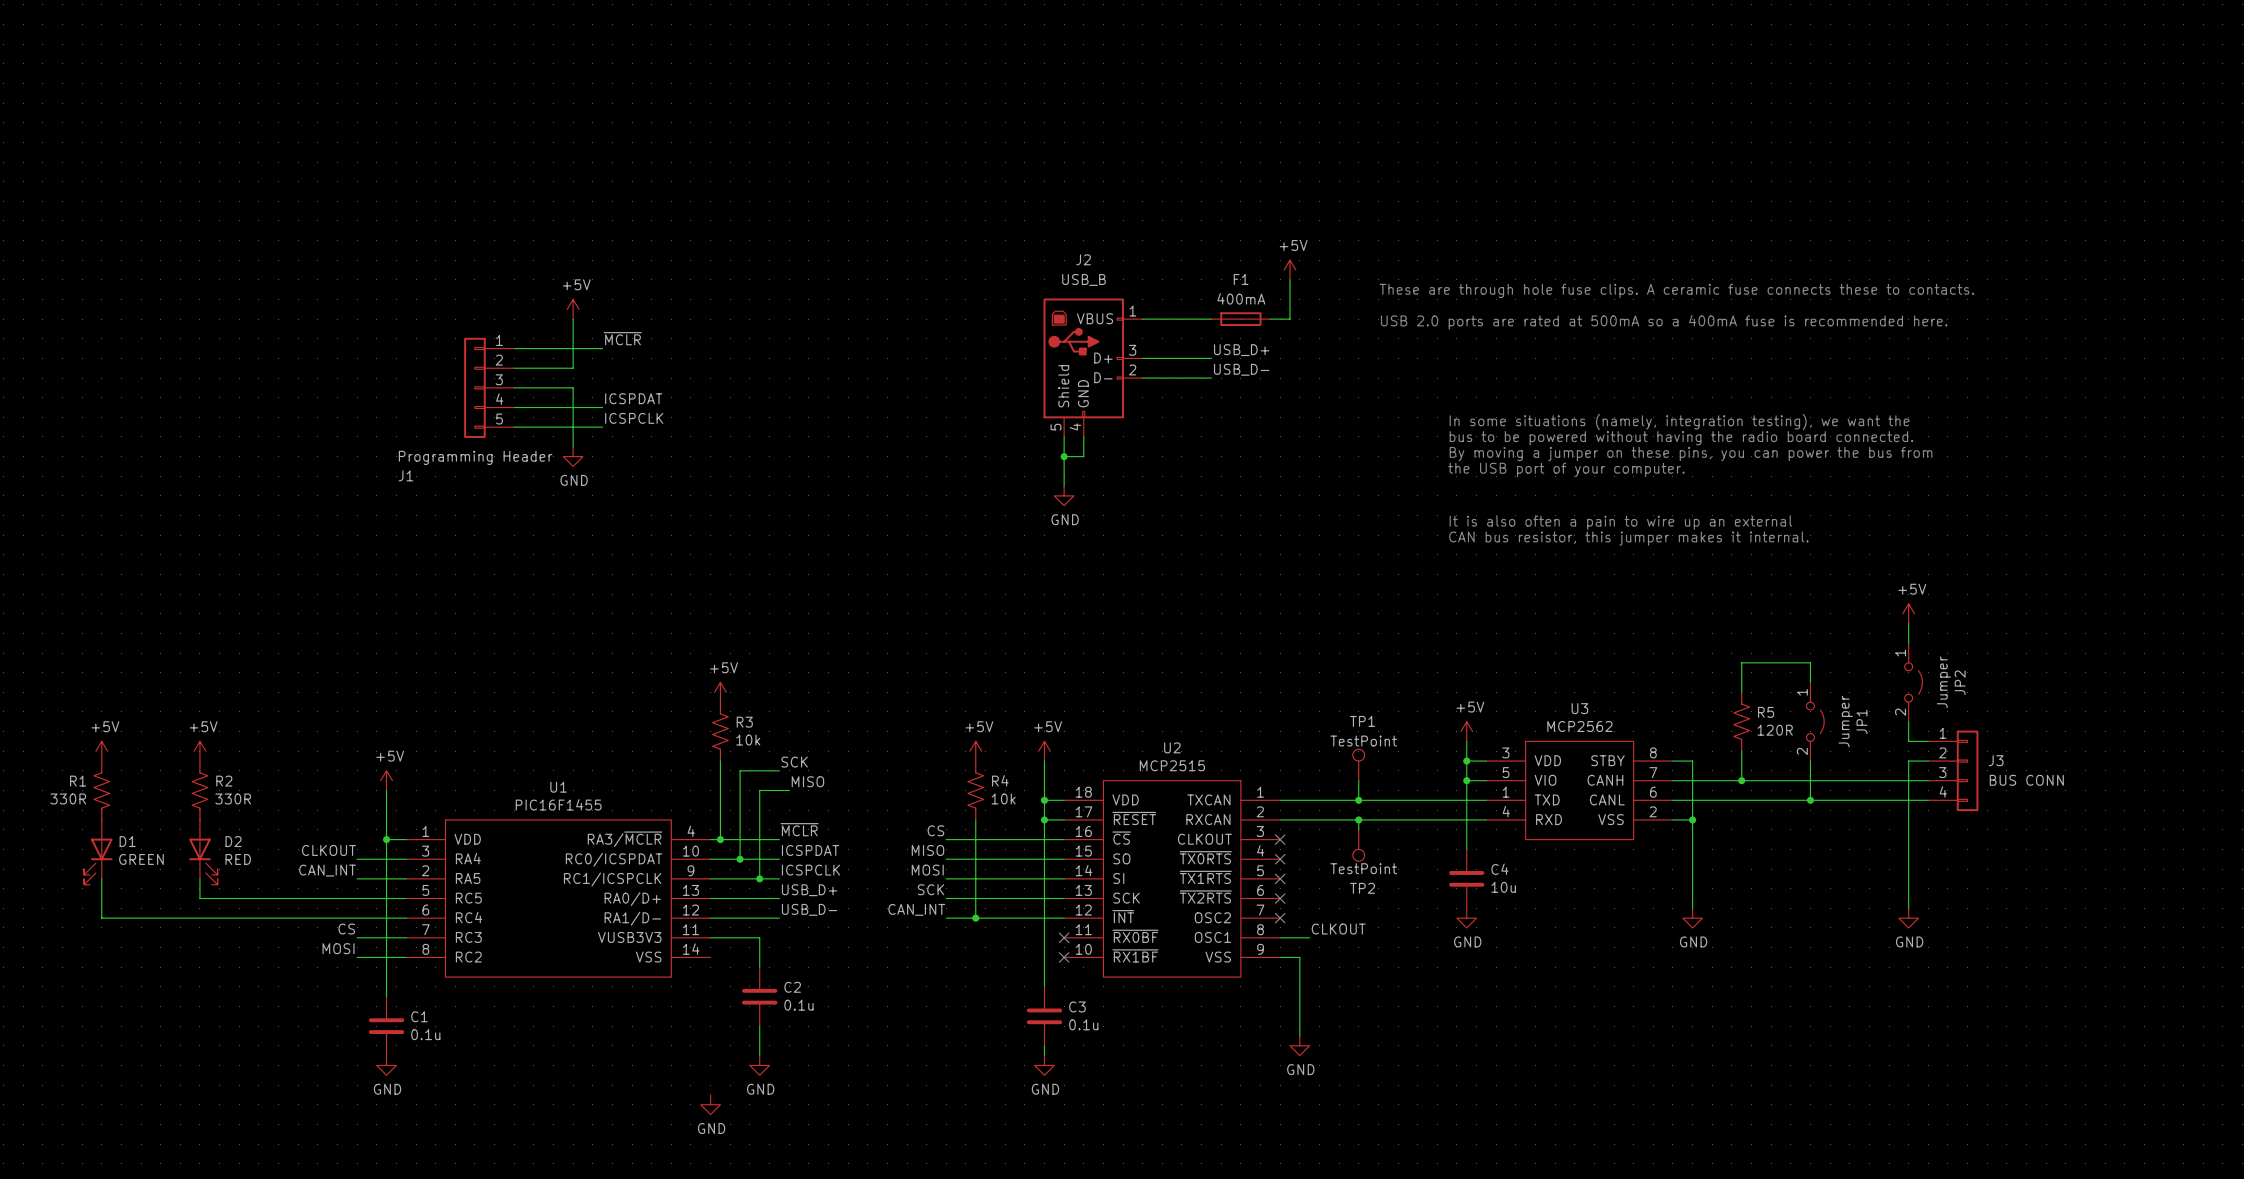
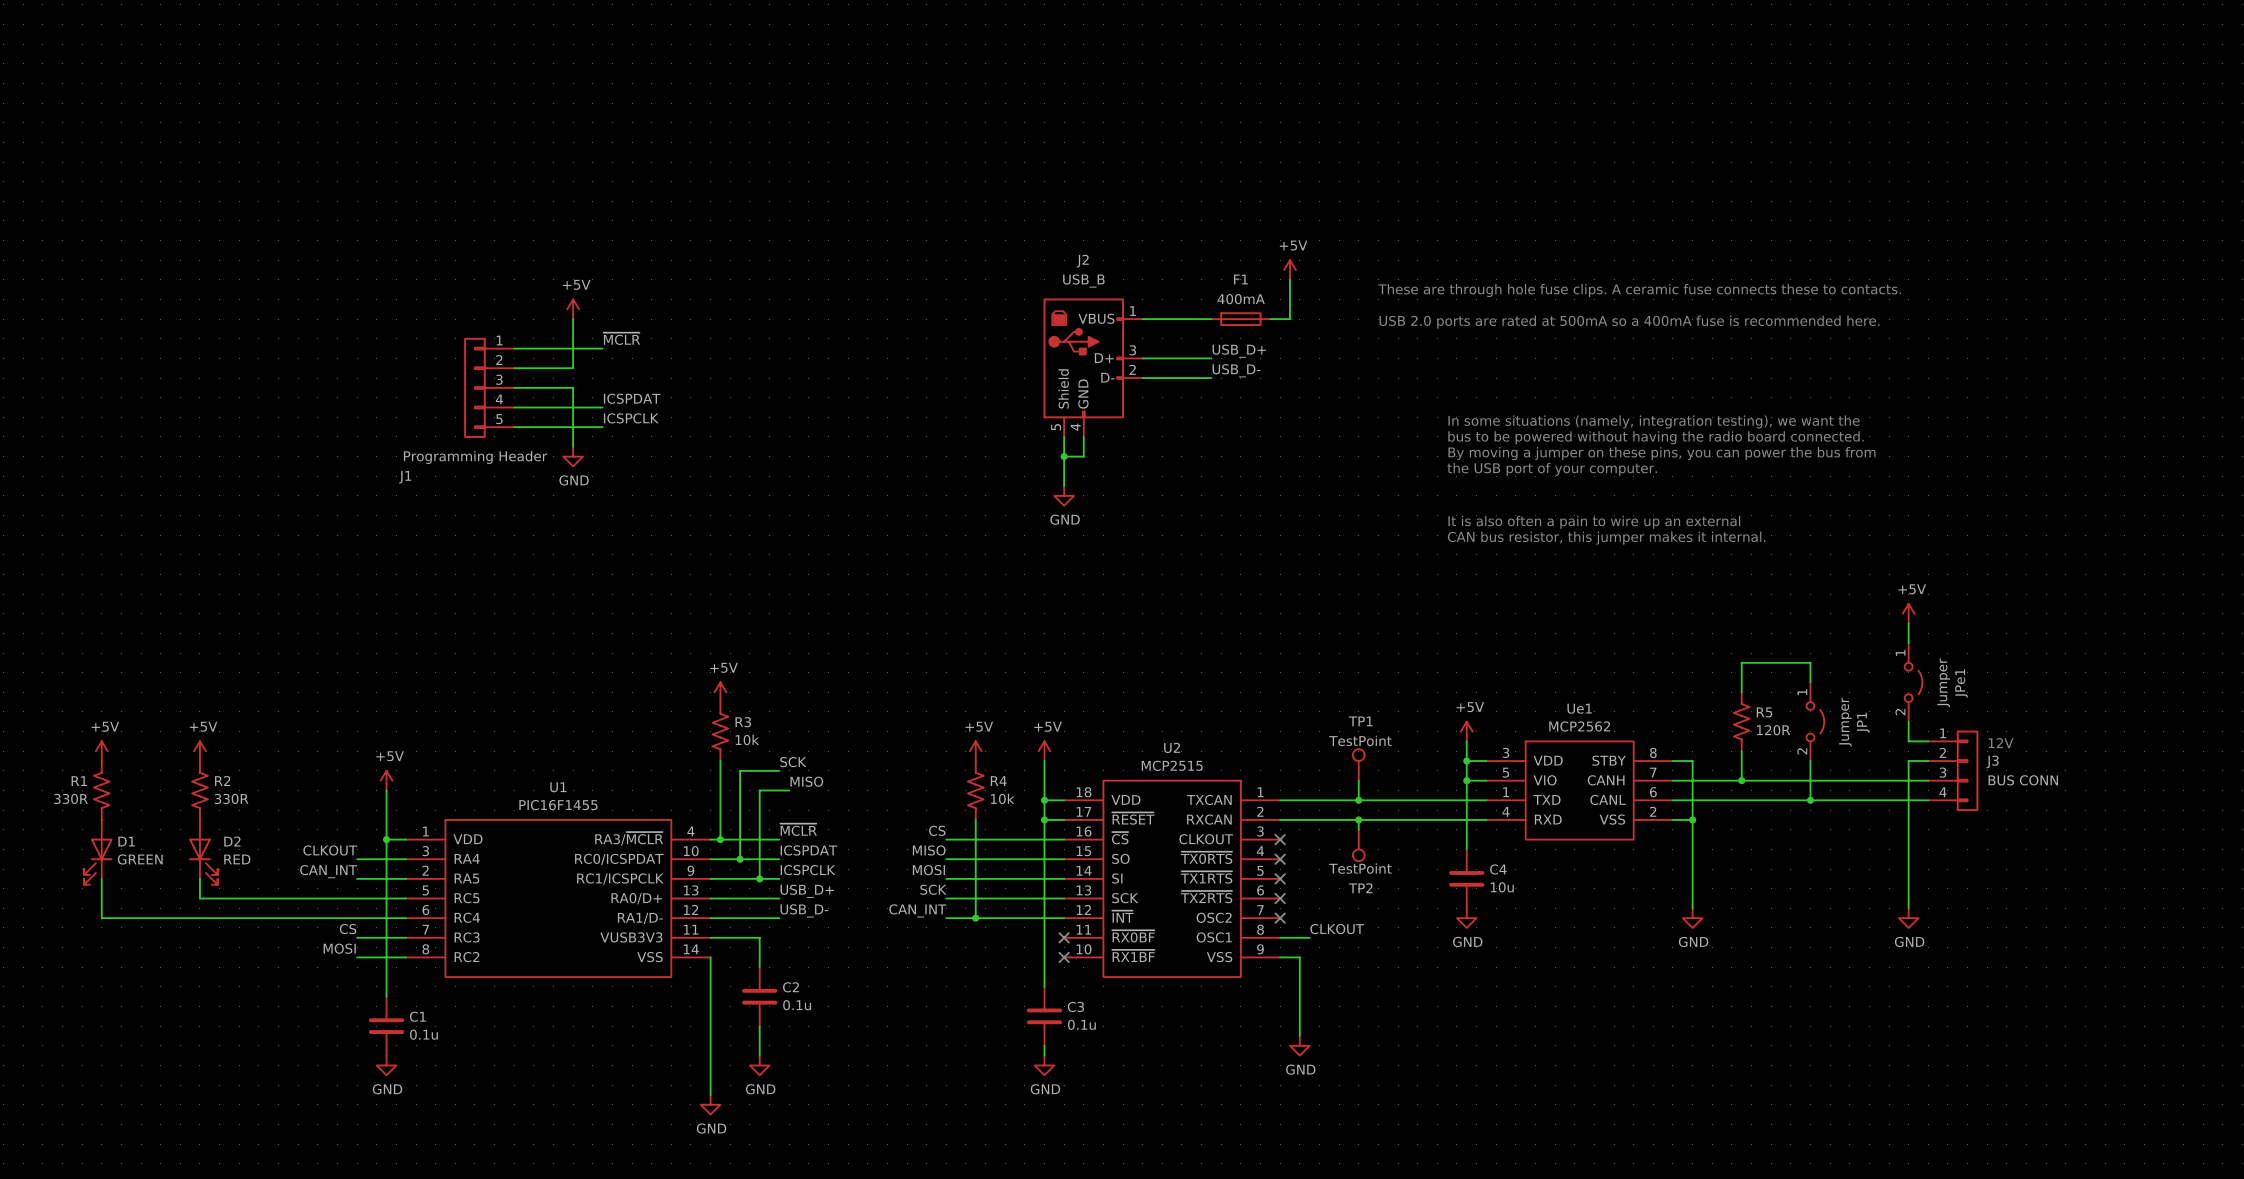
JP2 name: JP2 (1960, 682) -> JPe1 (1961, 683)
U3 name: U3 (1579, 708) -> Ue1 (1579, 708)
text: none -> 12V (2001, 743)
wire: none -> (710, 957) (710, 1094)

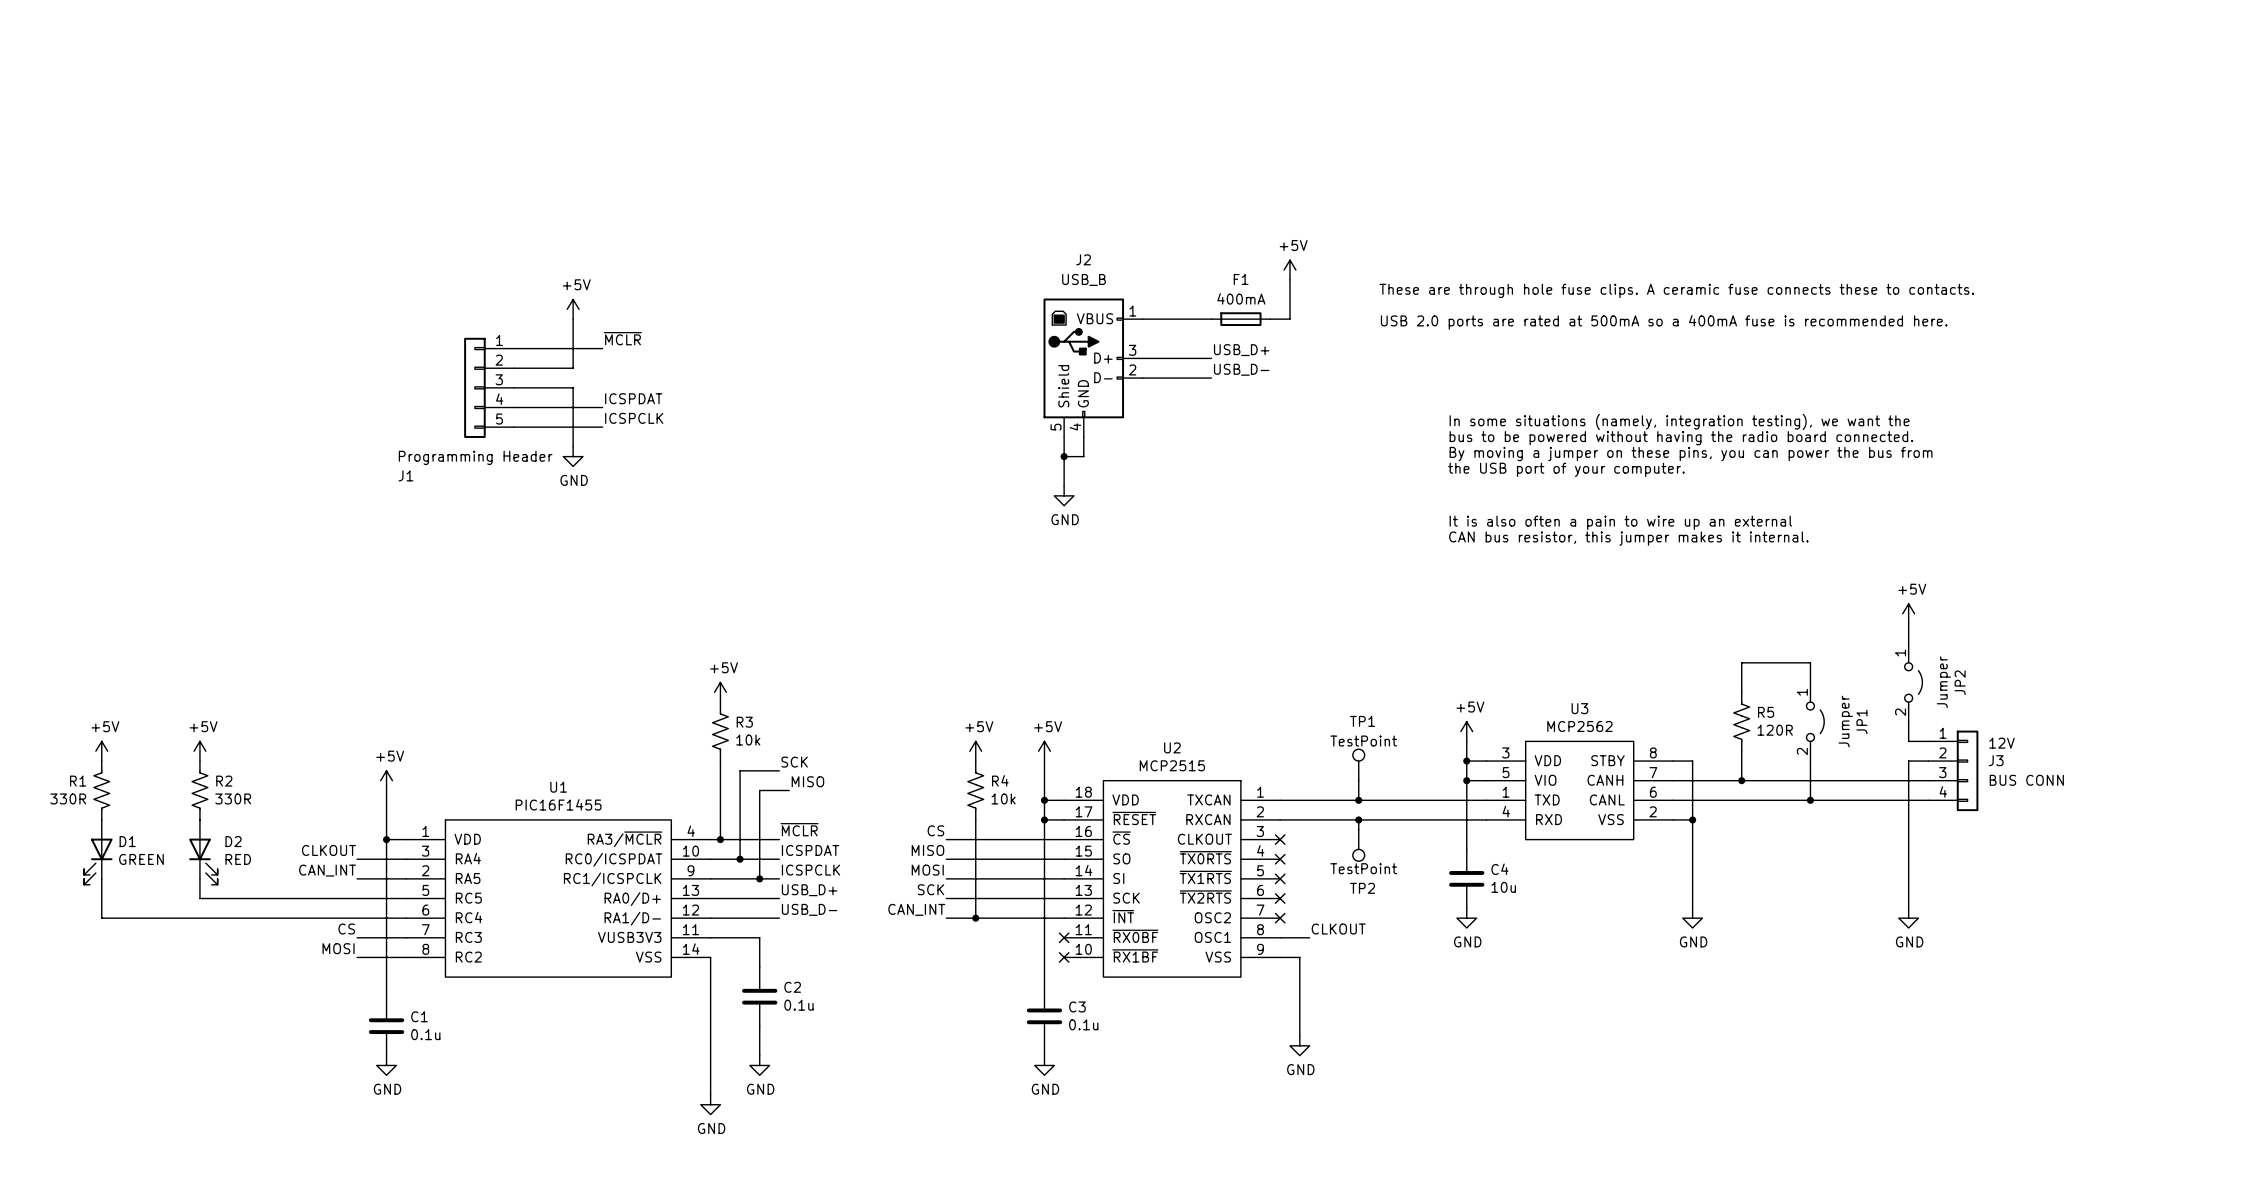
JPe1 name: JPe1 (1961, 683) -> JP2 (1960, 682)
Ue1 name: Ue1 (1579, 708) -> U3 (1579, 708)

